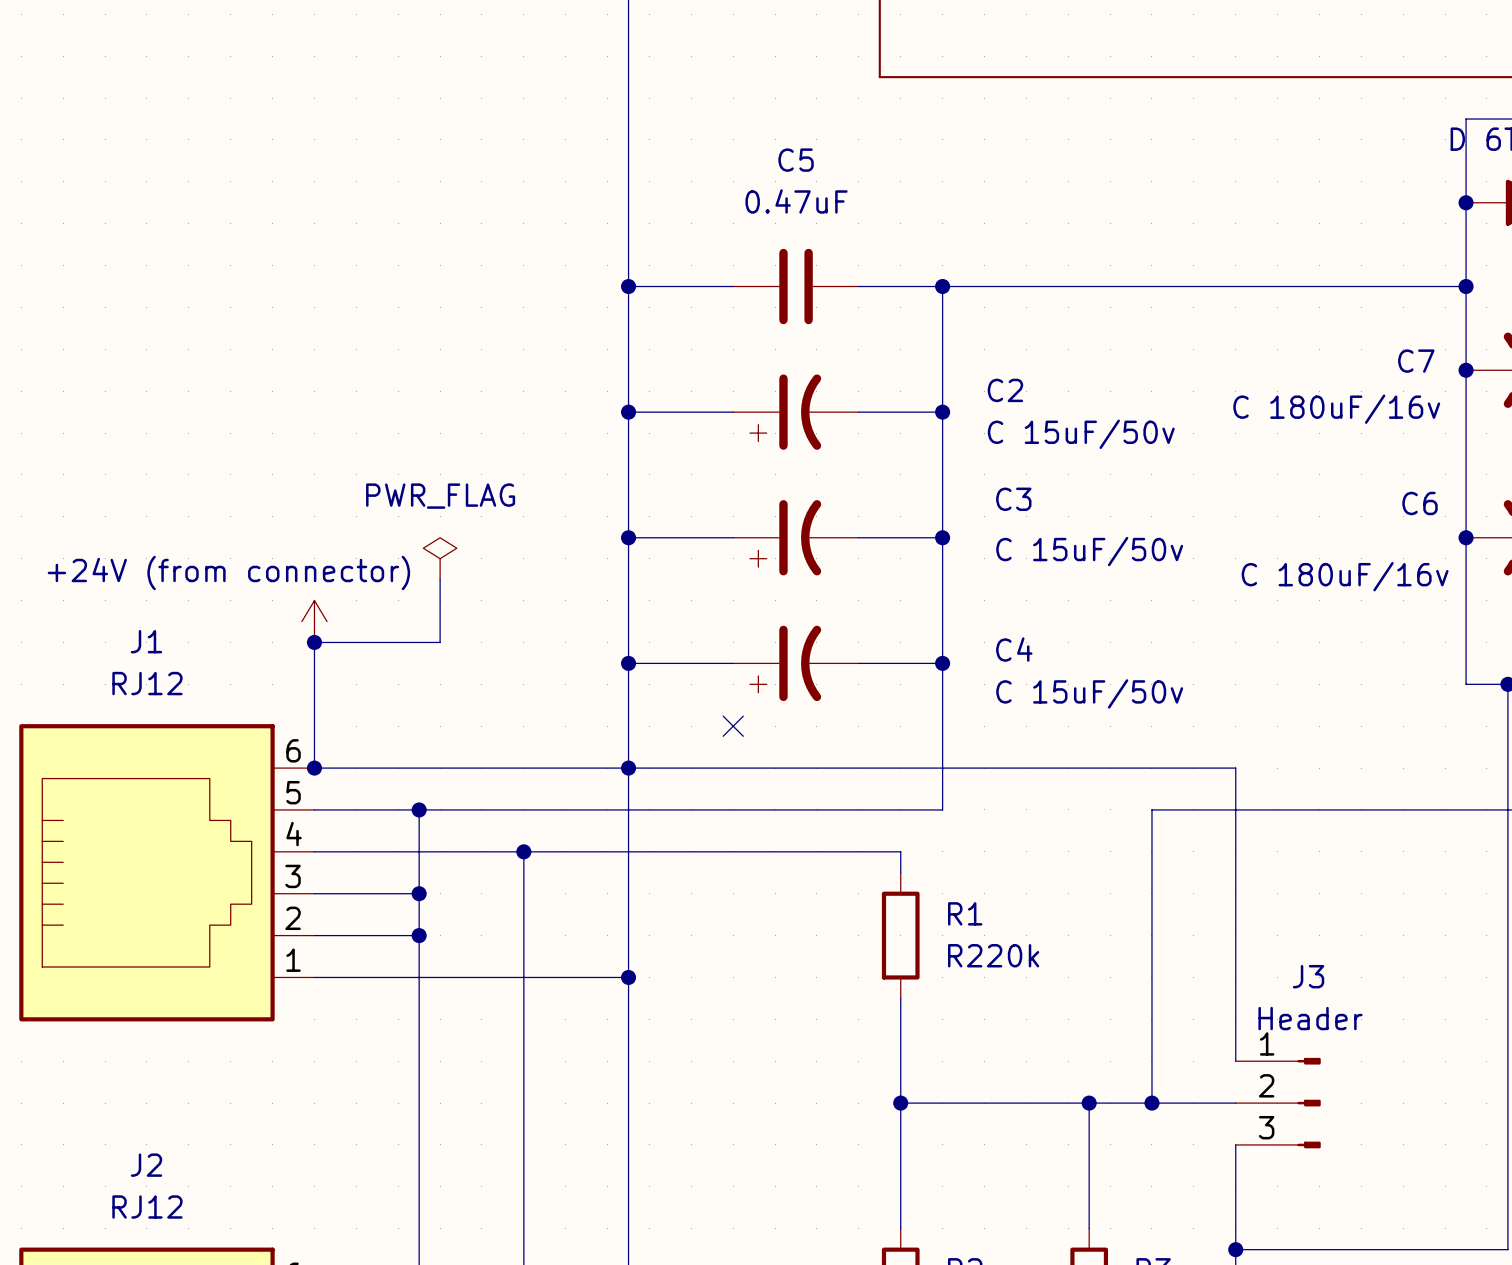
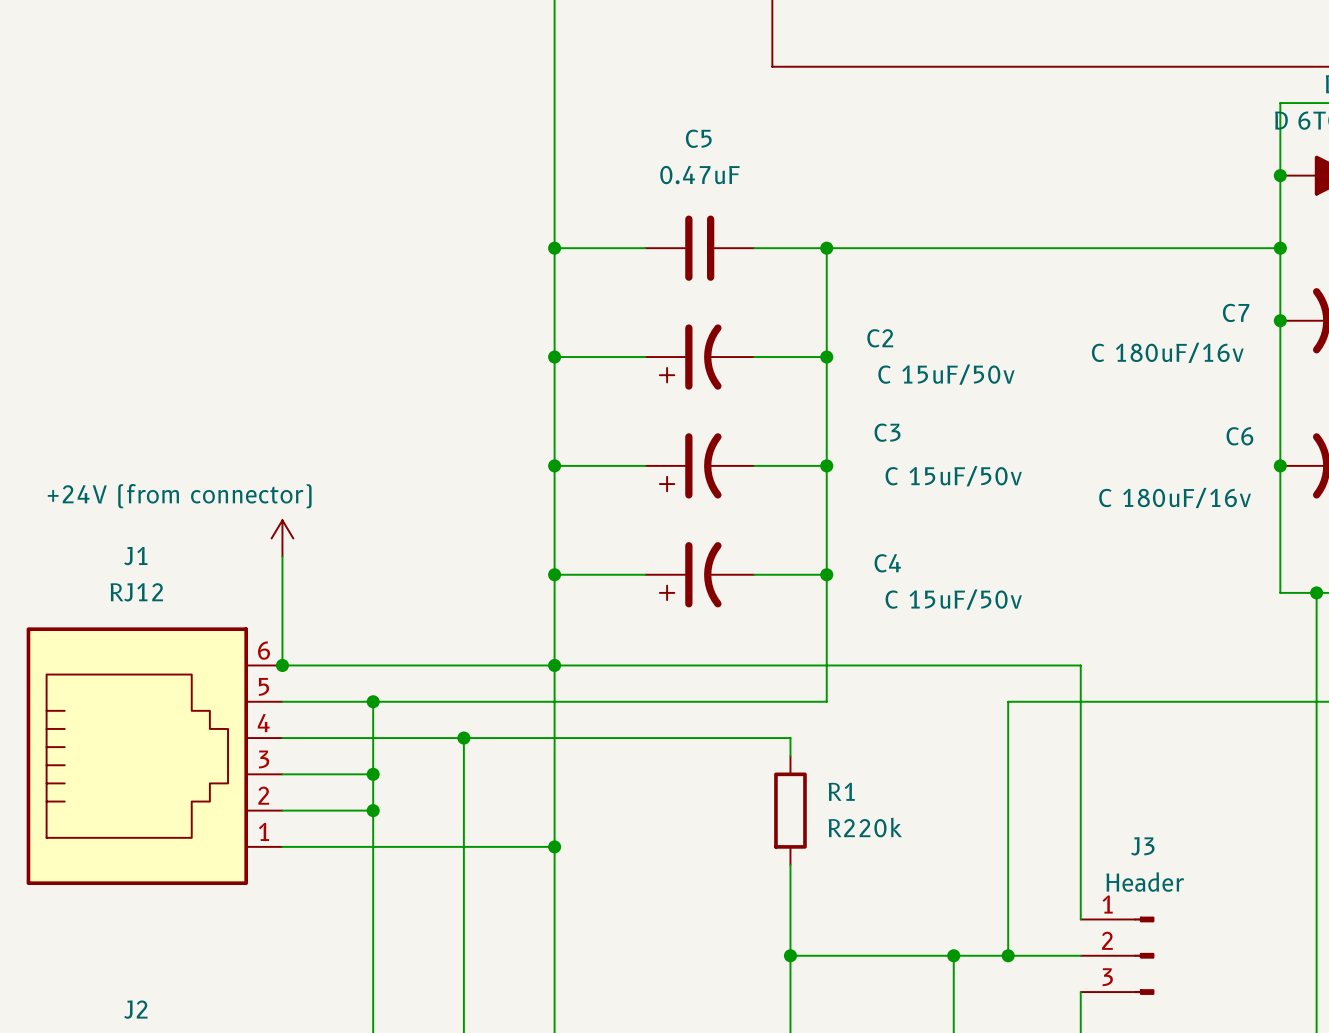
power symbol: PWR_FLAG (440, 558) -> none
wire: (440, 579) (440, 642) (314, 642) -> none
junction: (314, 642) -> none
no-connect mark: (733, 726) -> none

